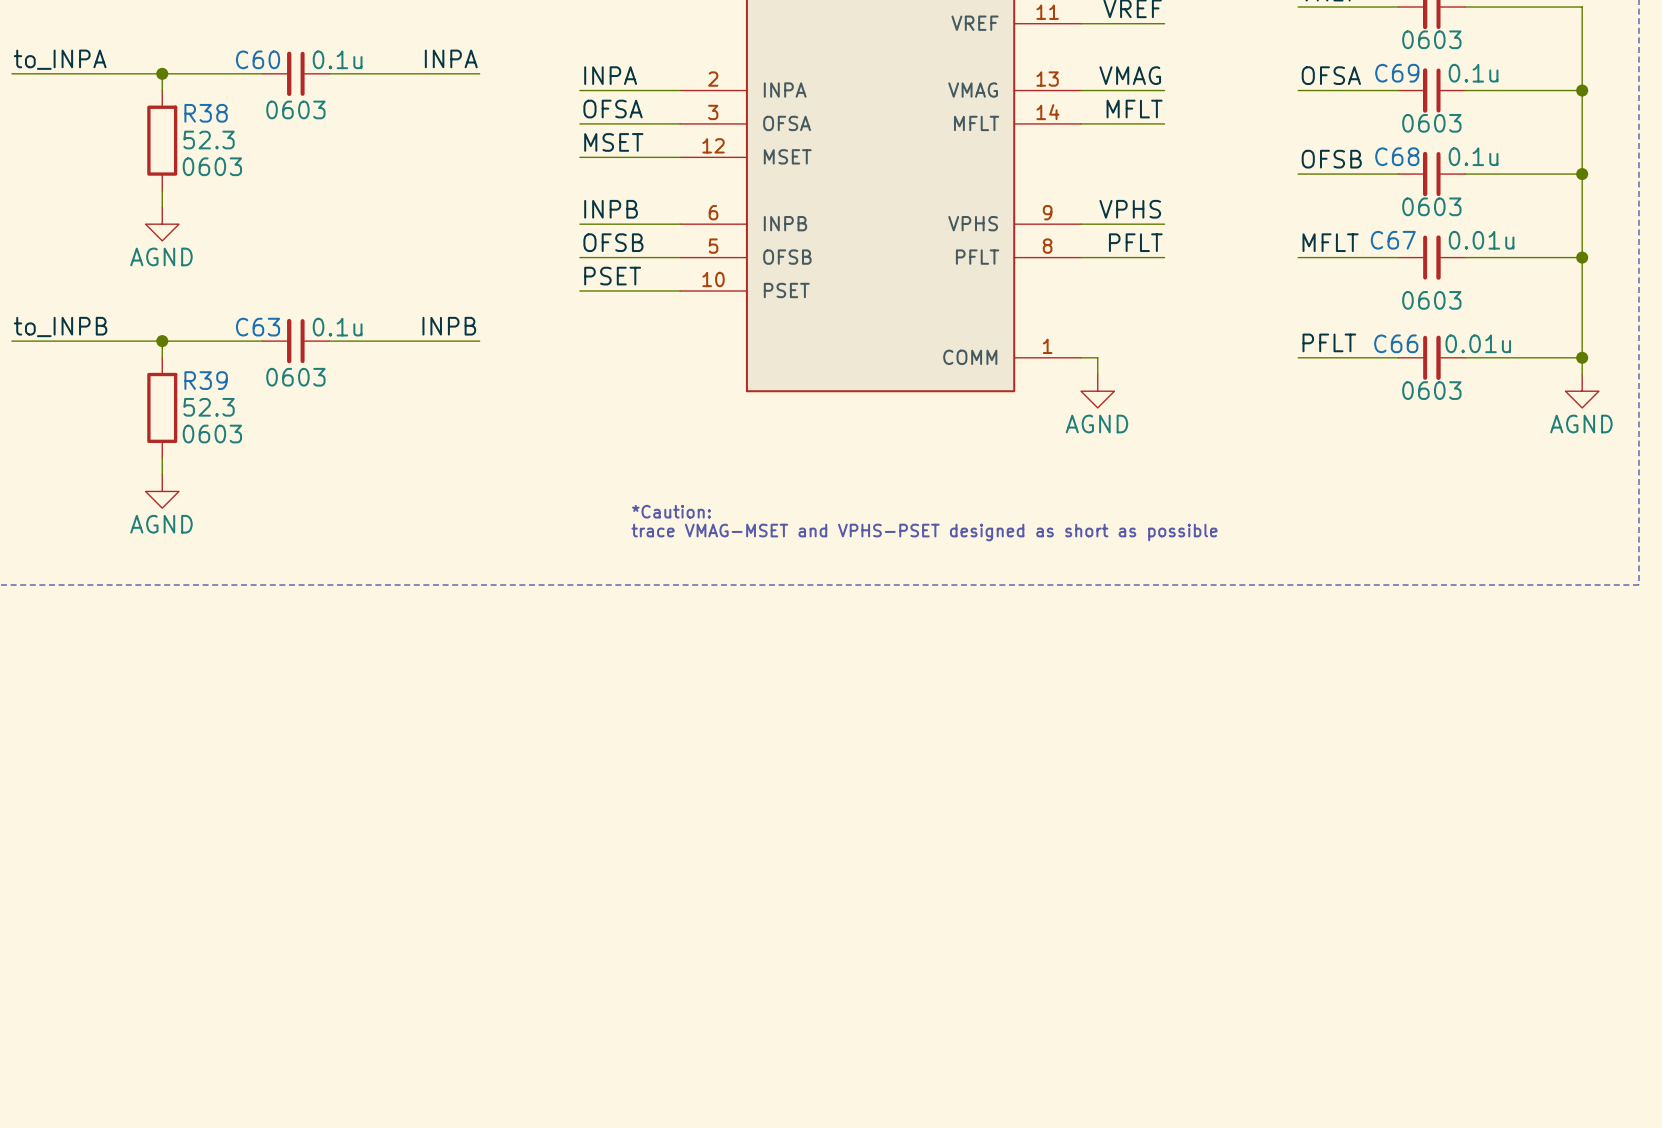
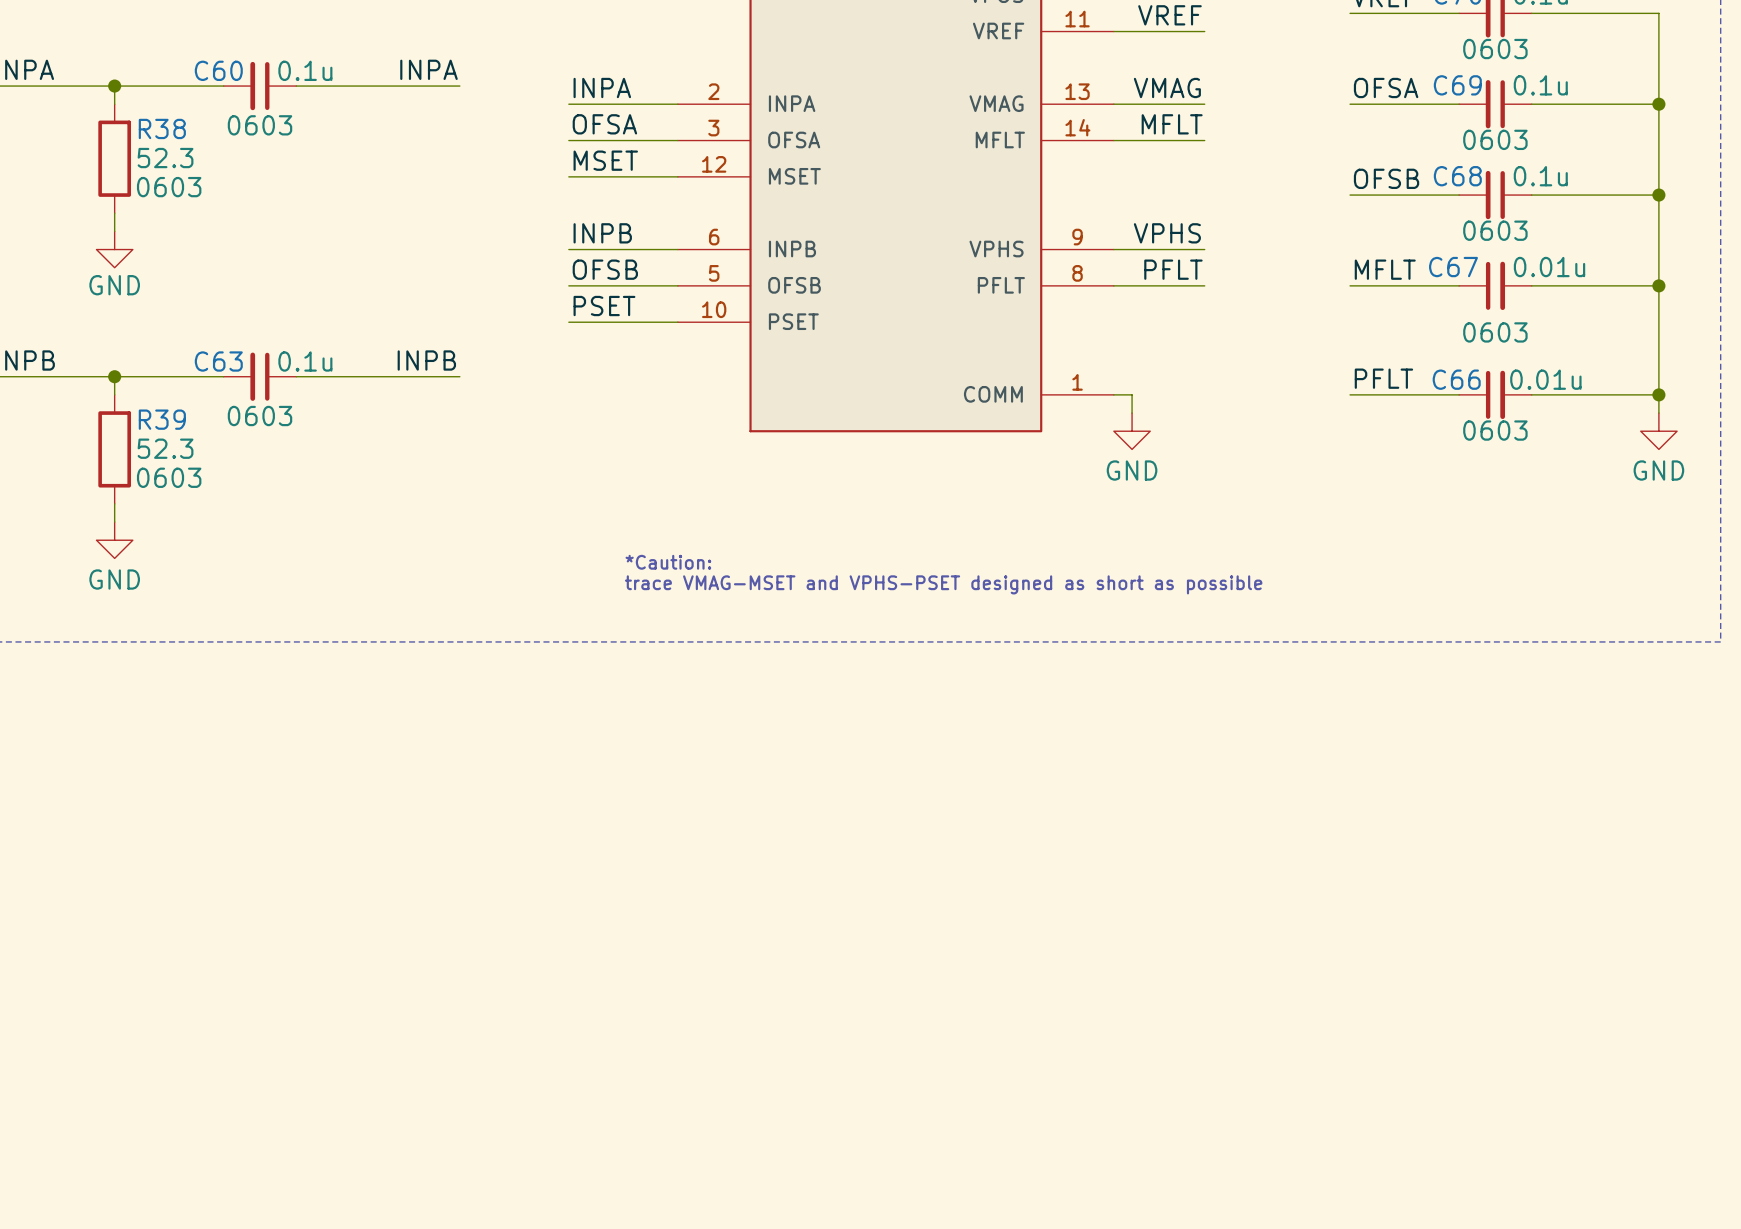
power symbol: AGND (162, 224) -> GND (114, 249)
power symbol: AGND (1097, 391) -> GND (1132, 431)
power symbol: AGND (1582, 391) -> GND (1658, 431)
power symbol: AGND (162, 491) -> GND (114, 540)

